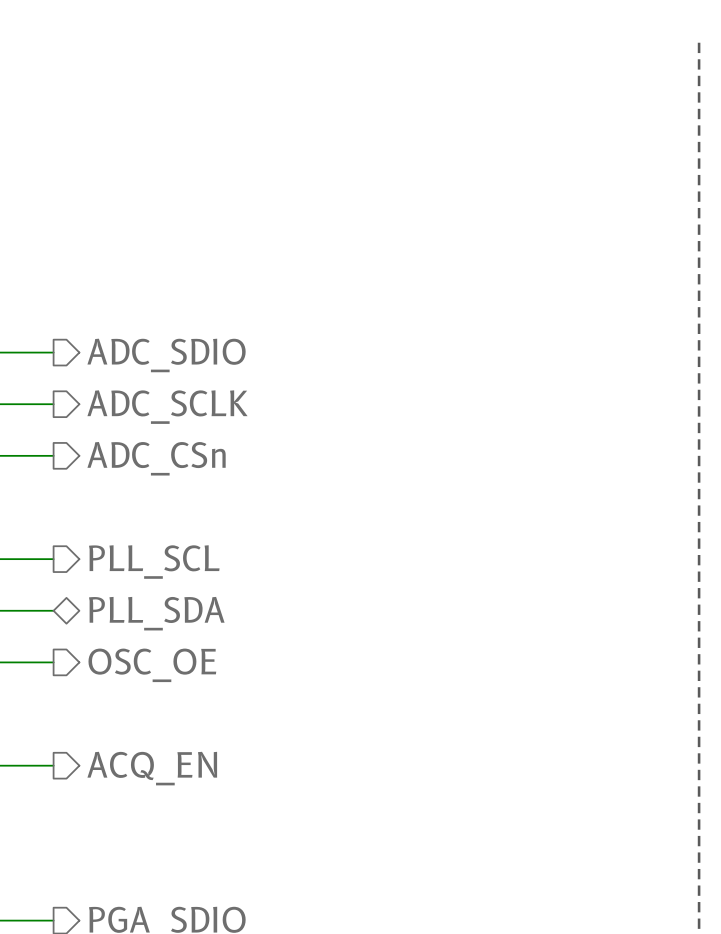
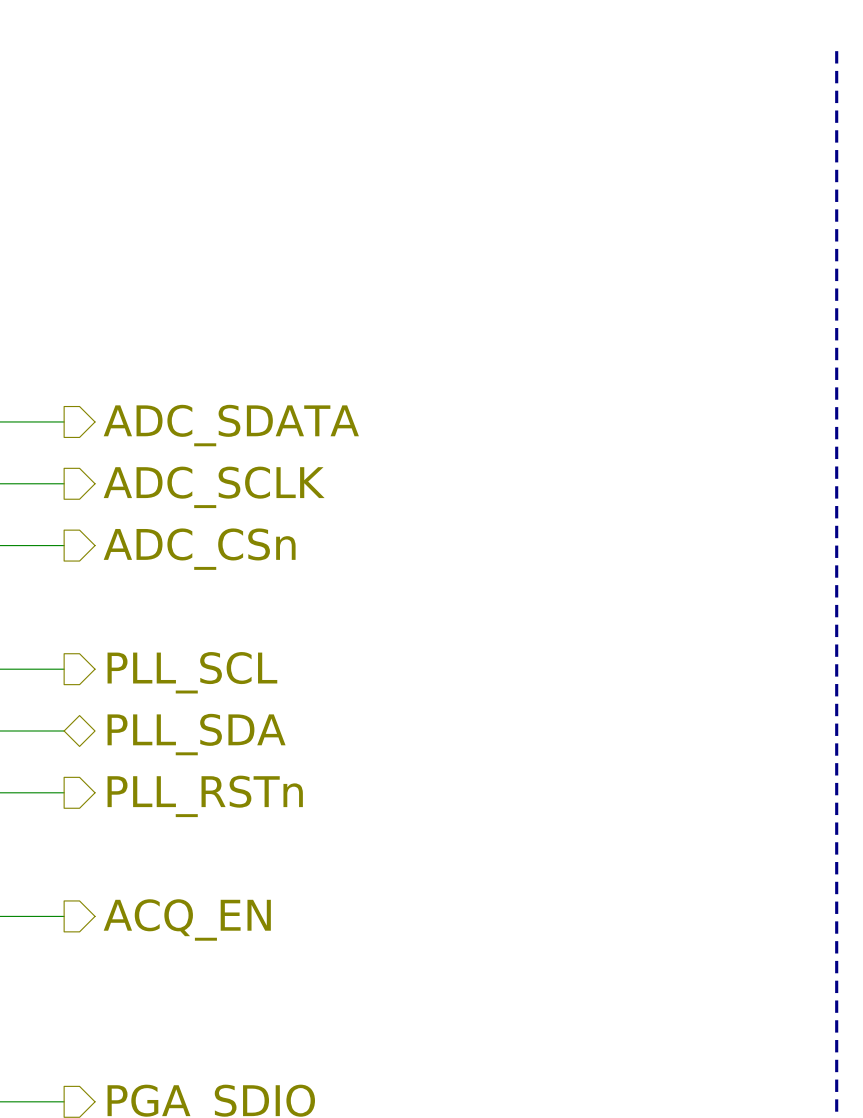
hierarchical label: ADC_SDIO (166, 355) -> ADC_SDATA (231, 425)
hierarchical label: OSC_OE (152, 665) -> PLL_RSTn (205, 796)

